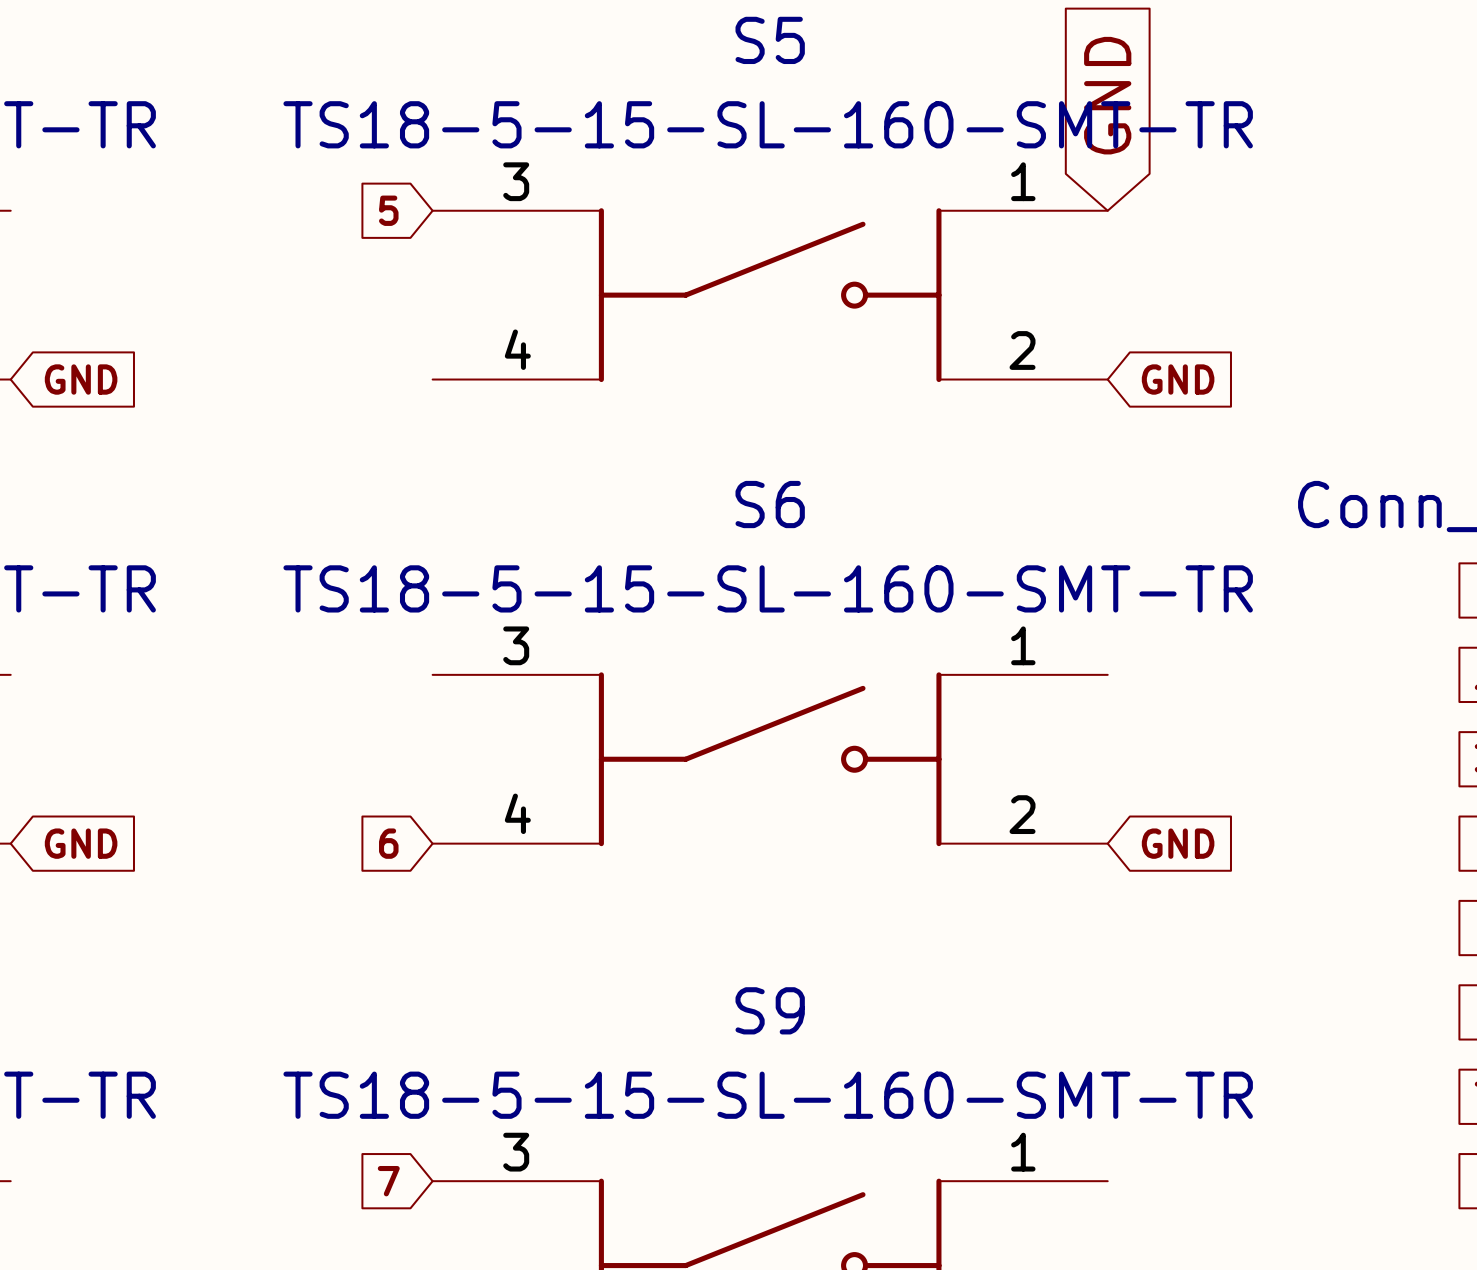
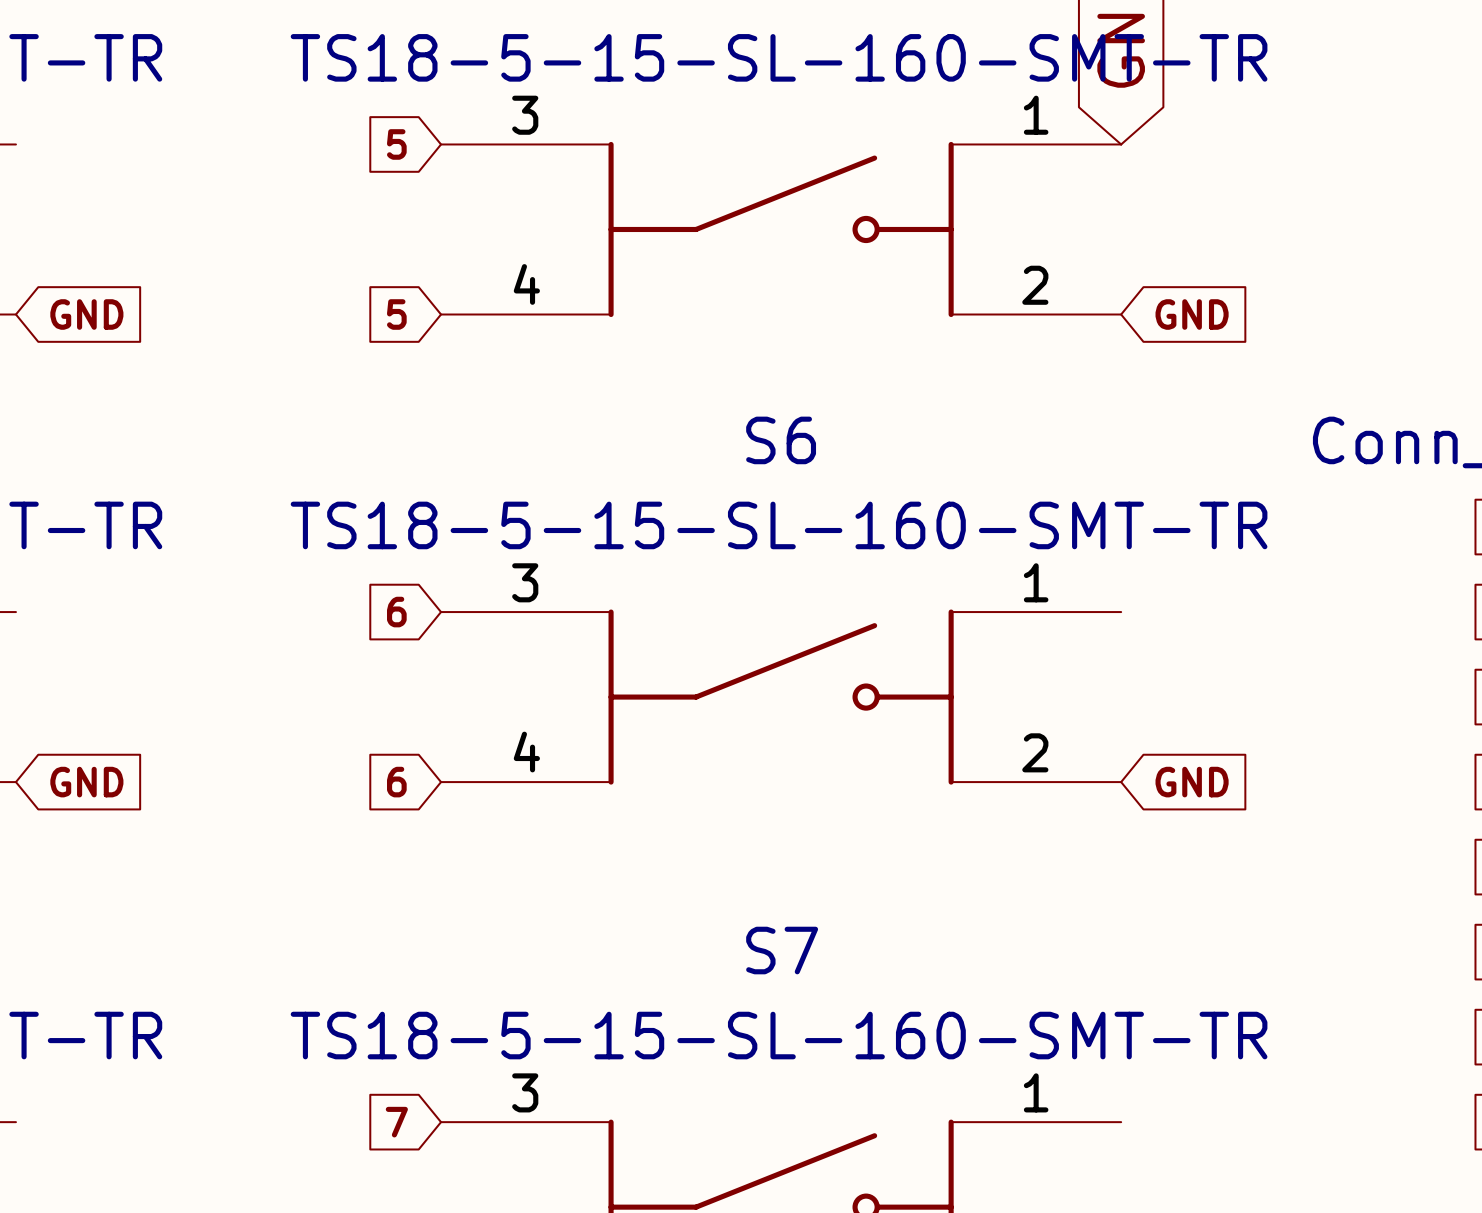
global label: none -> 5 (396, 314)
global label: none -> 6 (396, 612)
S9 name: S9 (770, 1010) -> S7 (782, 950)

